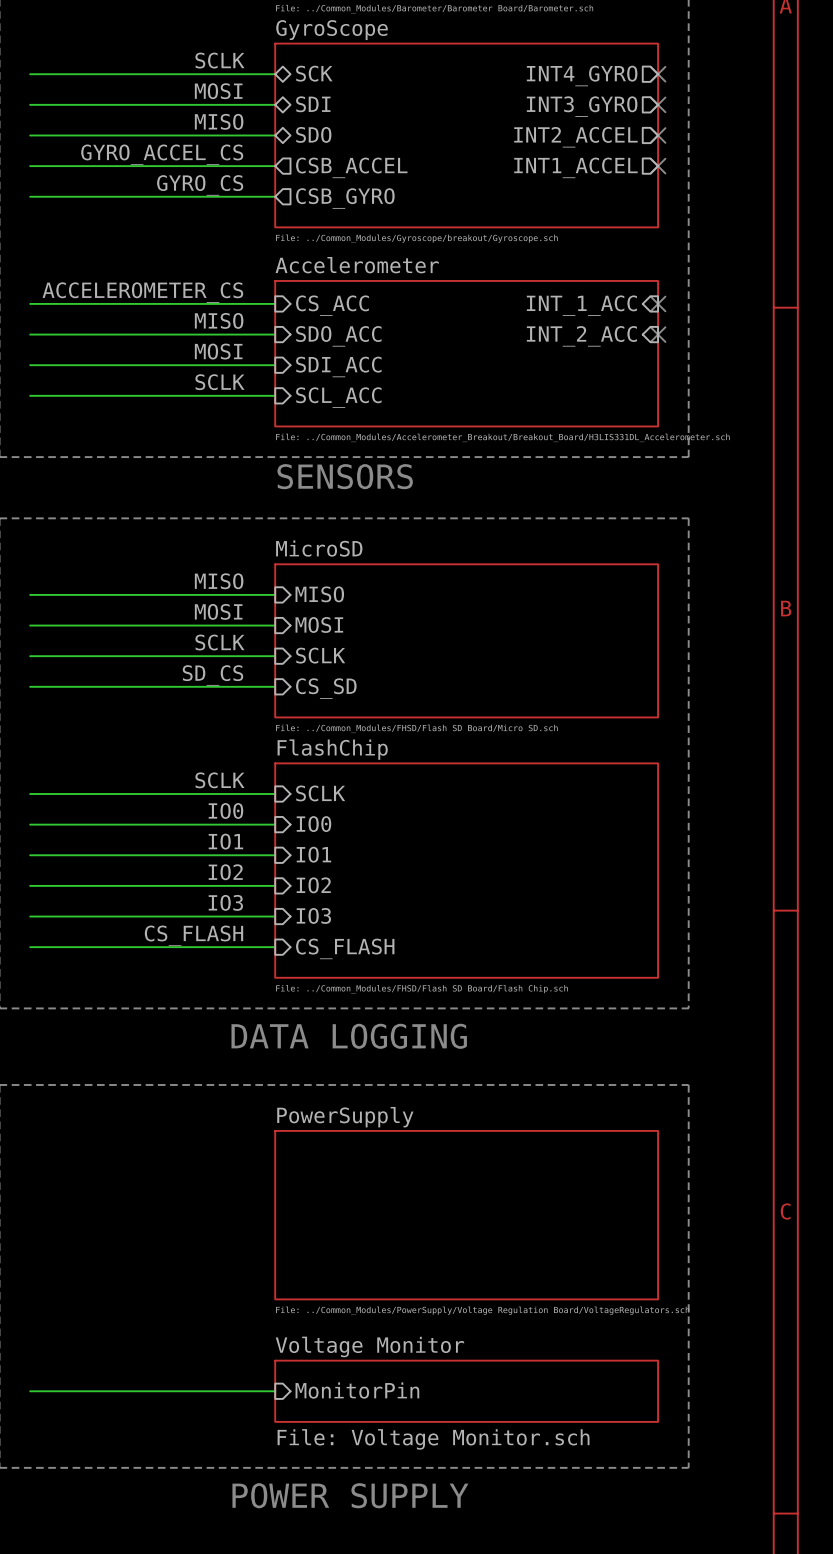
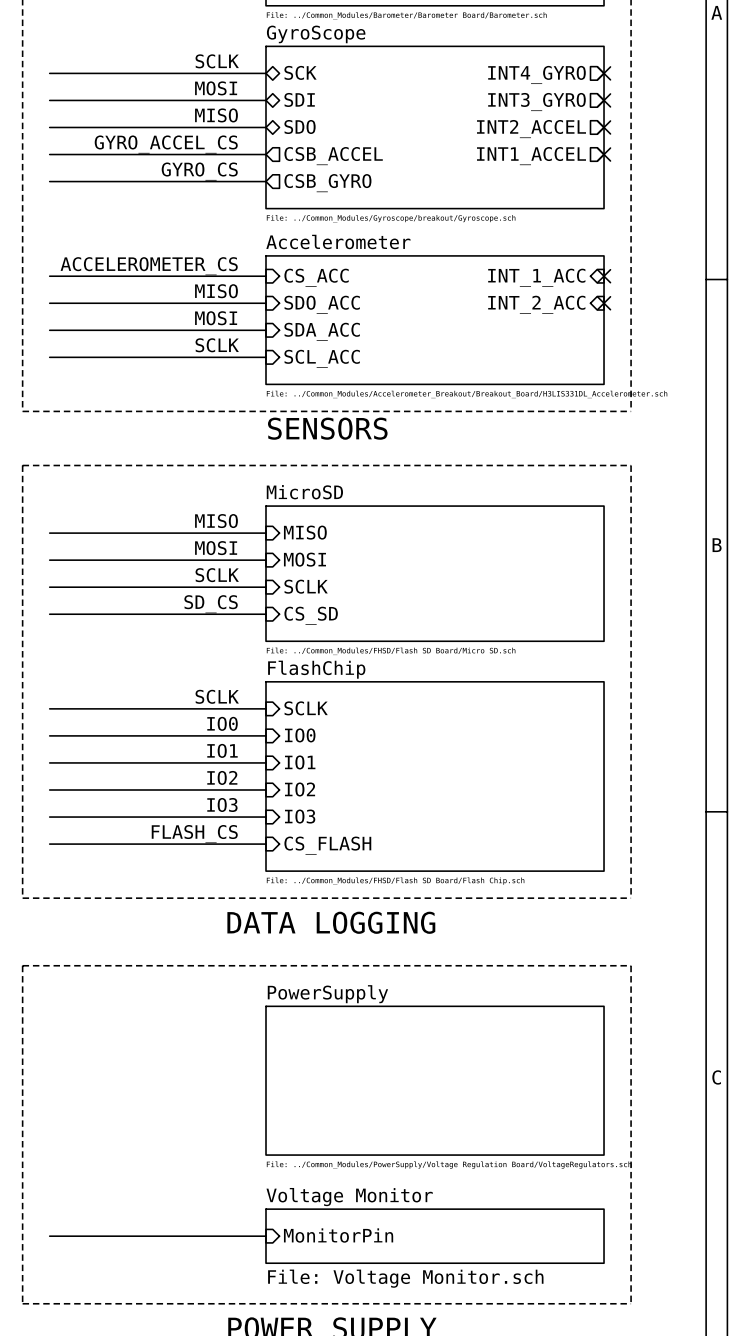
sheet pin: SDI_ACC (338, 366) -> SDA_ACC (322, 331)
label: CS_FLASH (193, 935) -> FLASH_CS (194, 834)

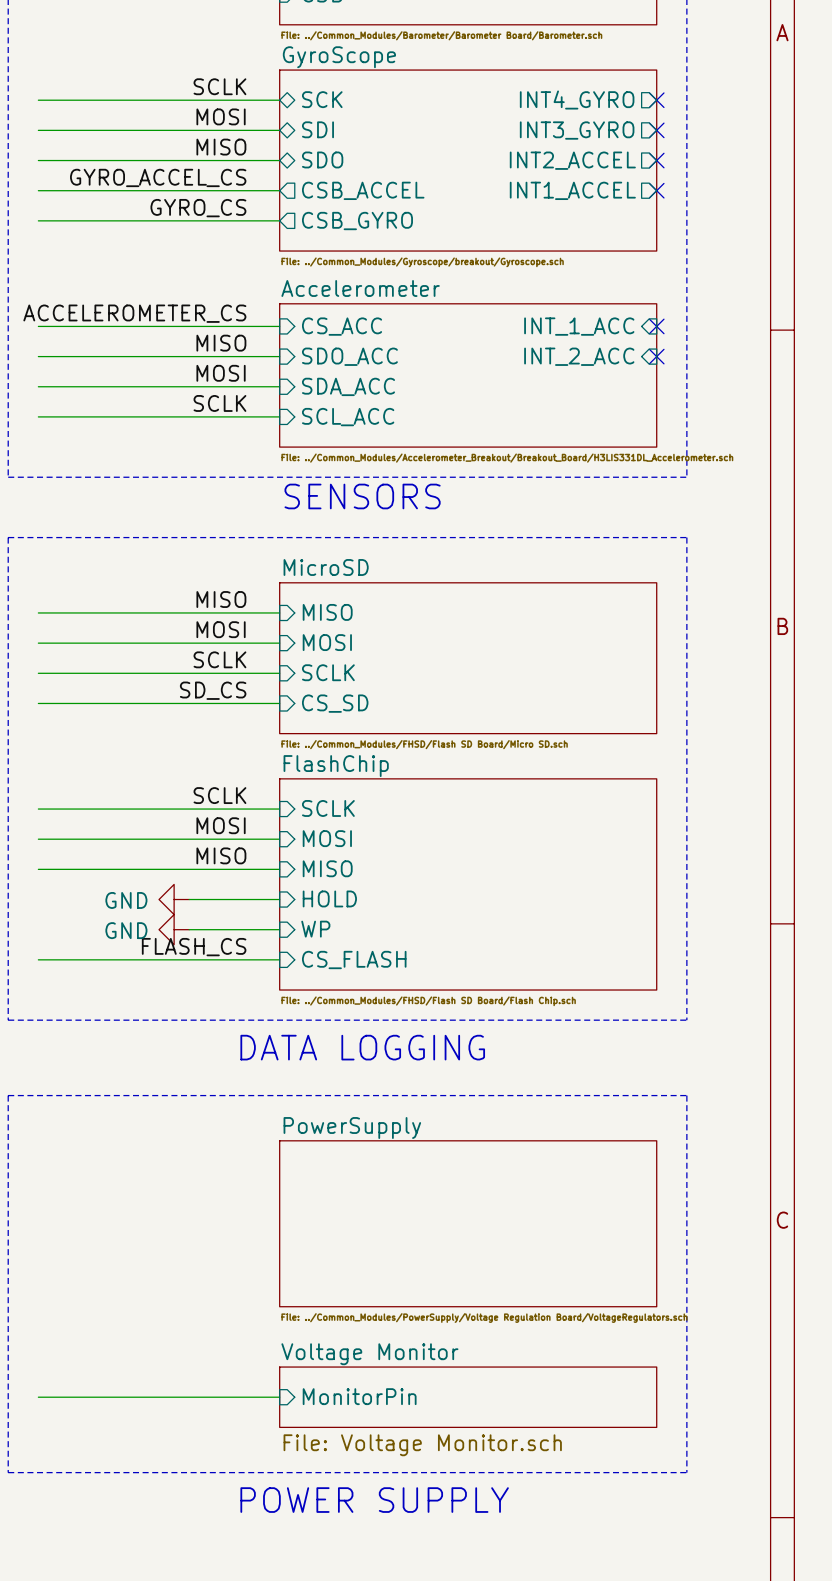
label: IO0 (222, 723) -> MOSI (221, 825)
sheet pin: IO0 (300, 735) -> MOSI (327, 838)
label: IO1 (222, 750) -> MISO (221, 855)
sheet pin: IO1 (300, 762) -> MISO (327, 868)
label: IO2 (222, 777) -> none
wire: (49, 789) (184, 789) -> none
power symbol: none -> GND (174, 899)
sheet pin: IO2 (300, 789) -> HOLD (329, 898)
label: IO3 (222, 804) -> none
sheet pin: IO3 (300, 816) -> WP (315, 929)
wire: (49, 817) (184, 817) -> none
power symbol: none -> GND (174, 929)

